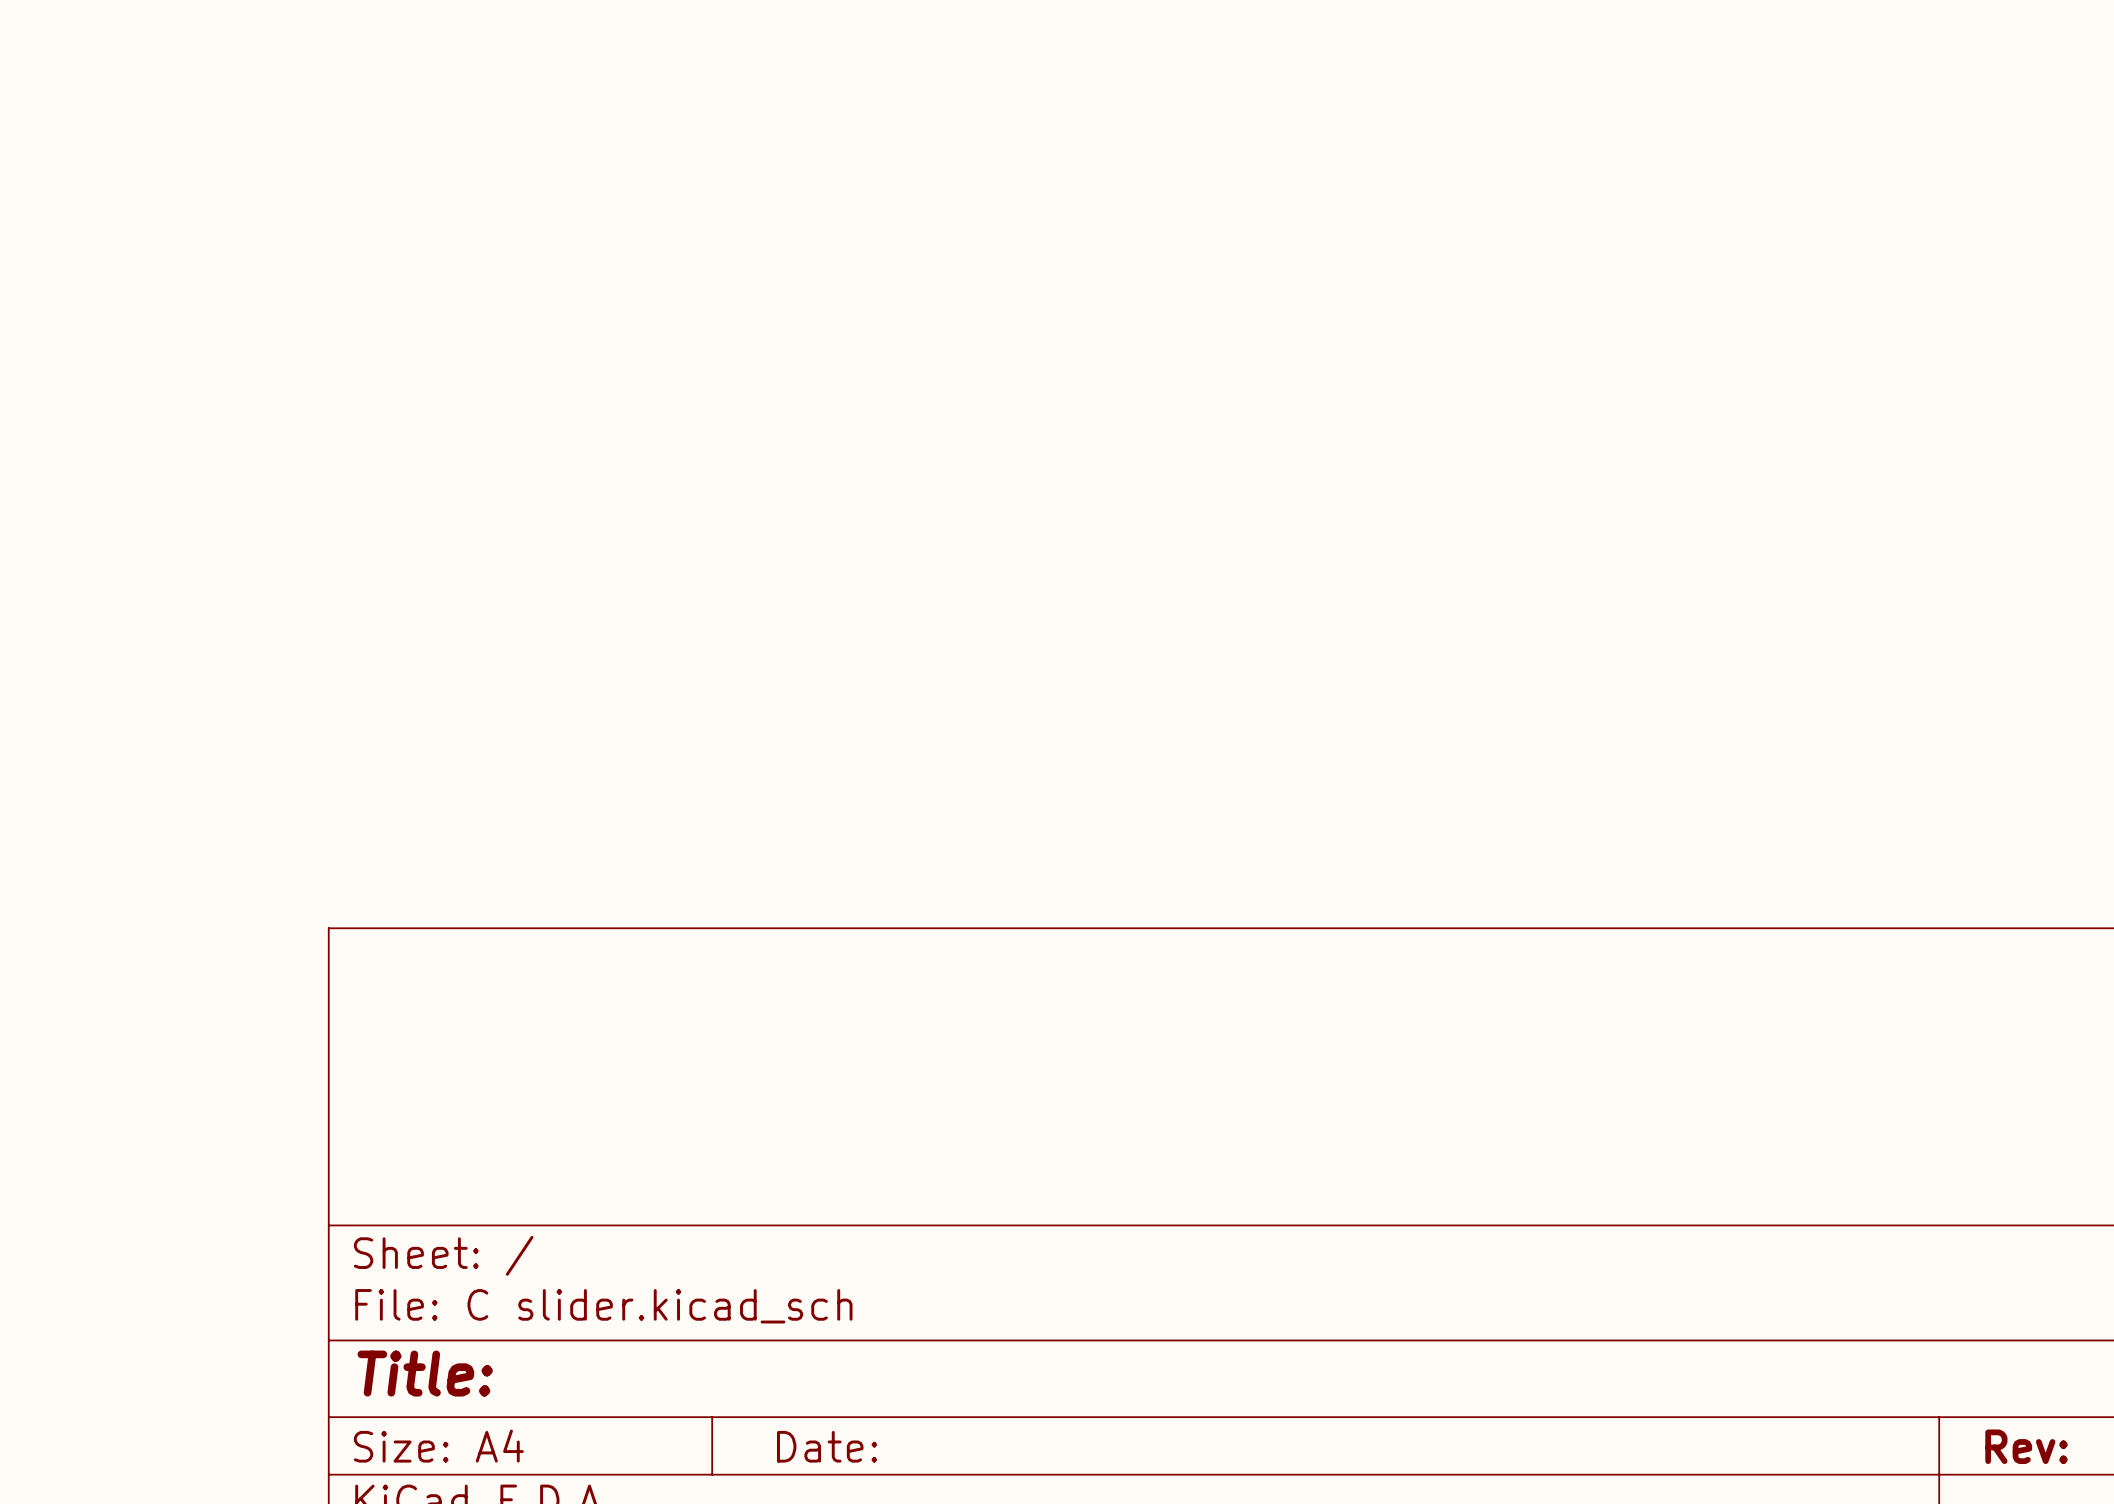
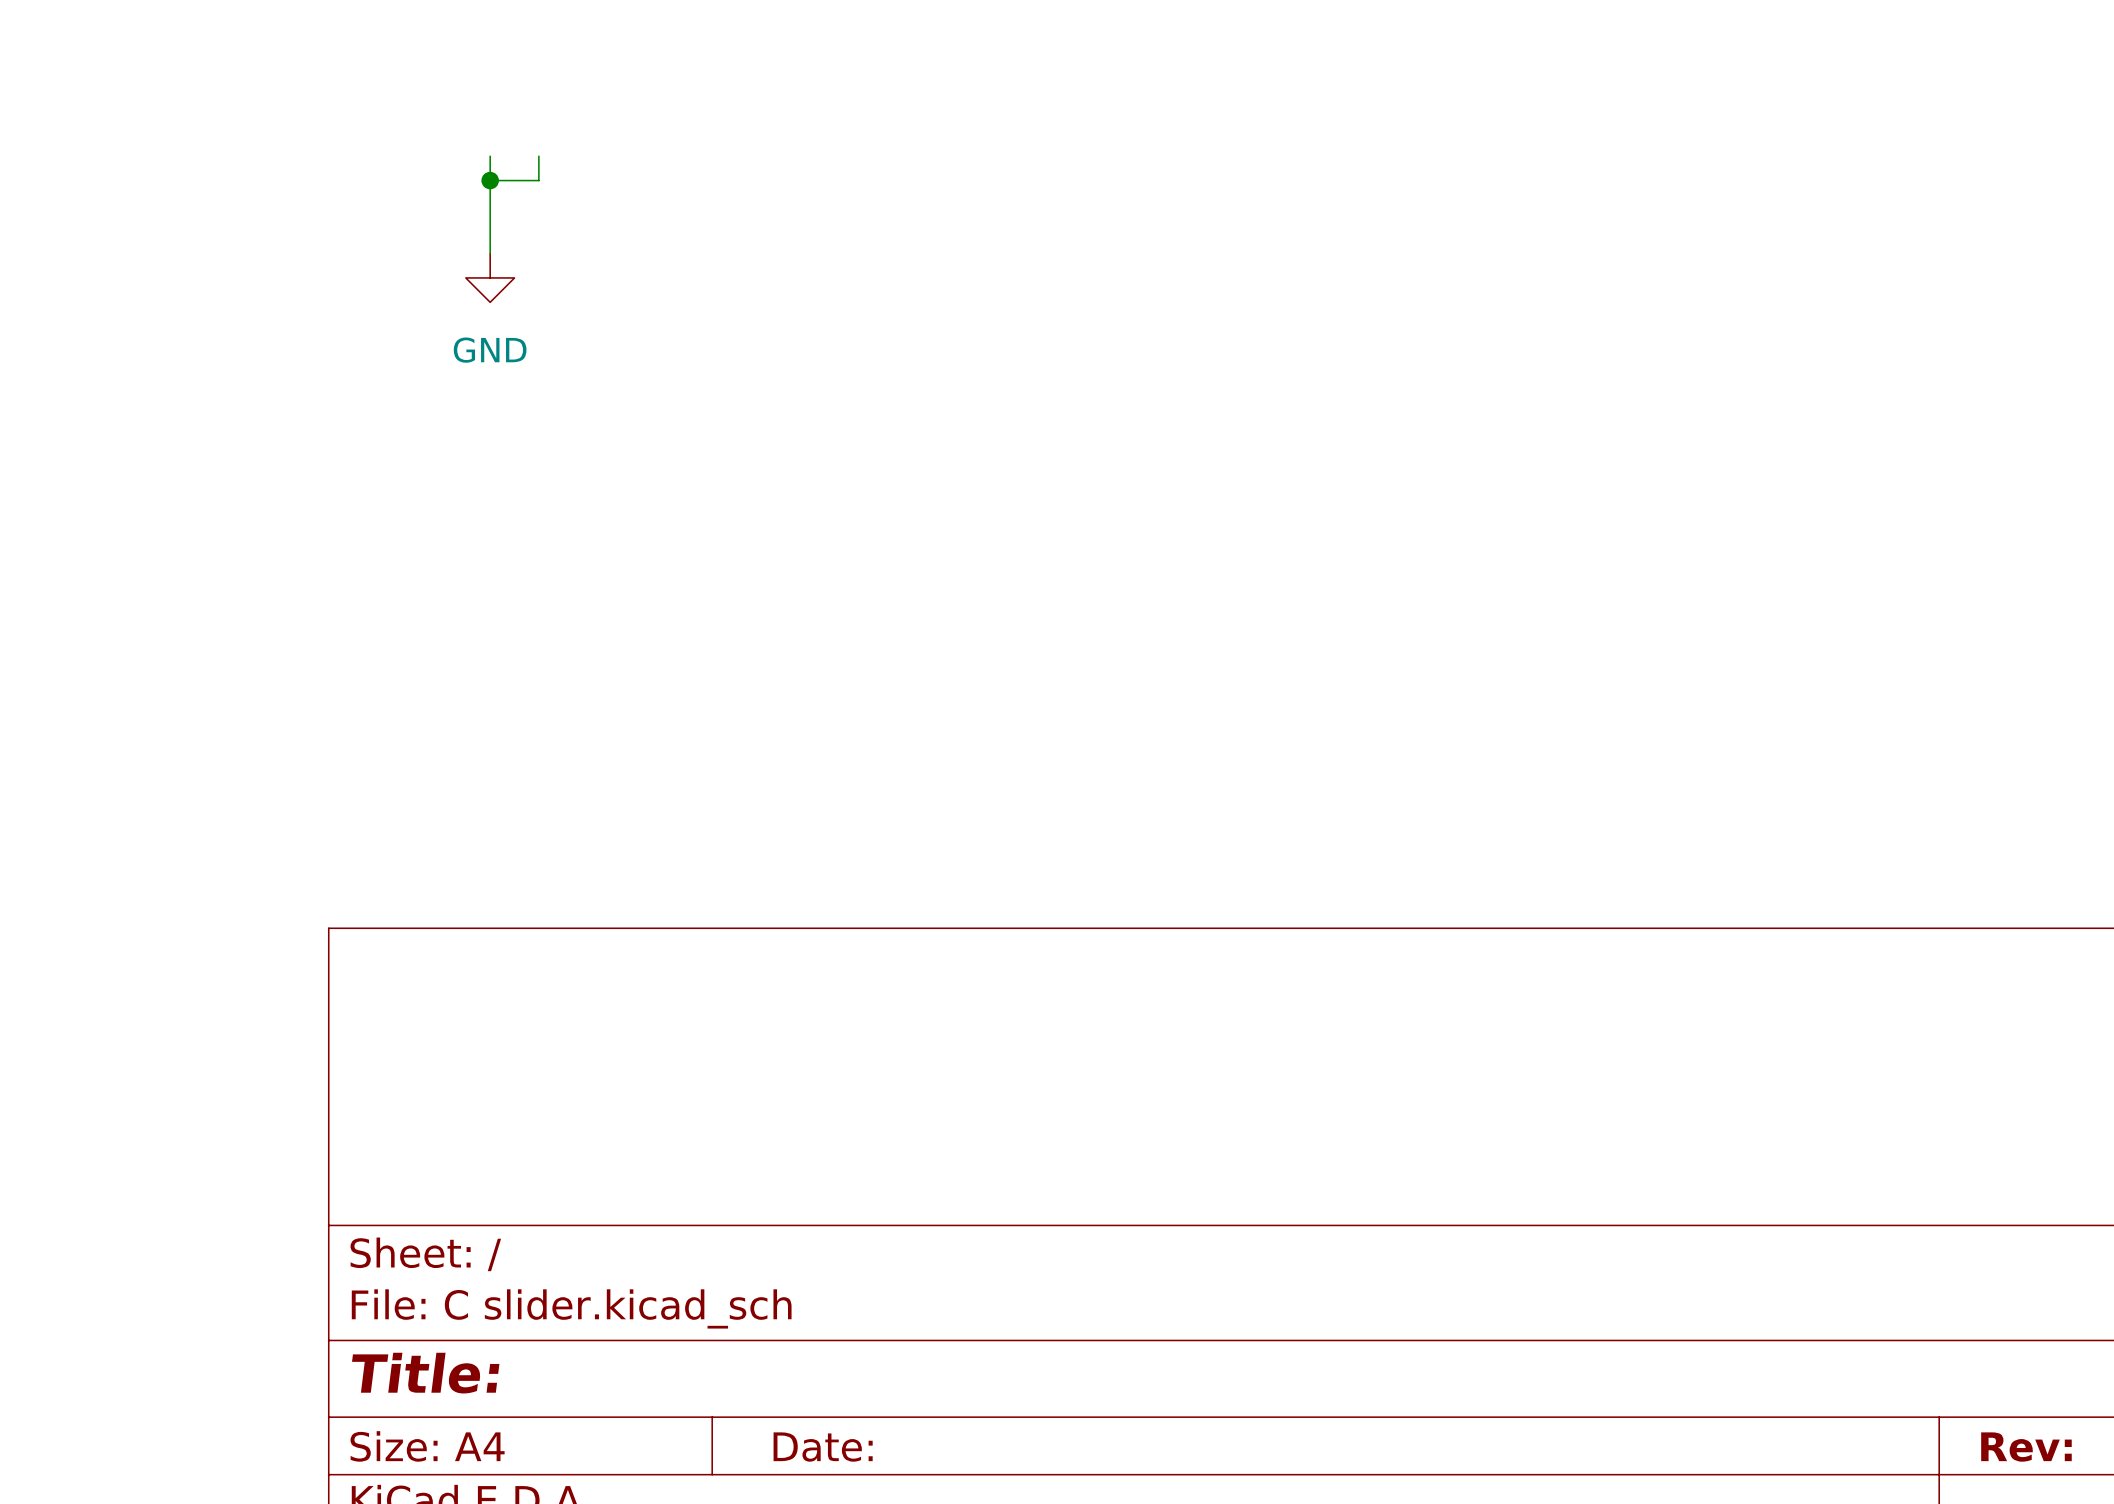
wire: none -> (490, 156) (490, 253)
wire: none -> (538, 156) (538, 180) (490, 180)
junction: none -> (490, 180)
power symbol: none -> GND (490, 277)

